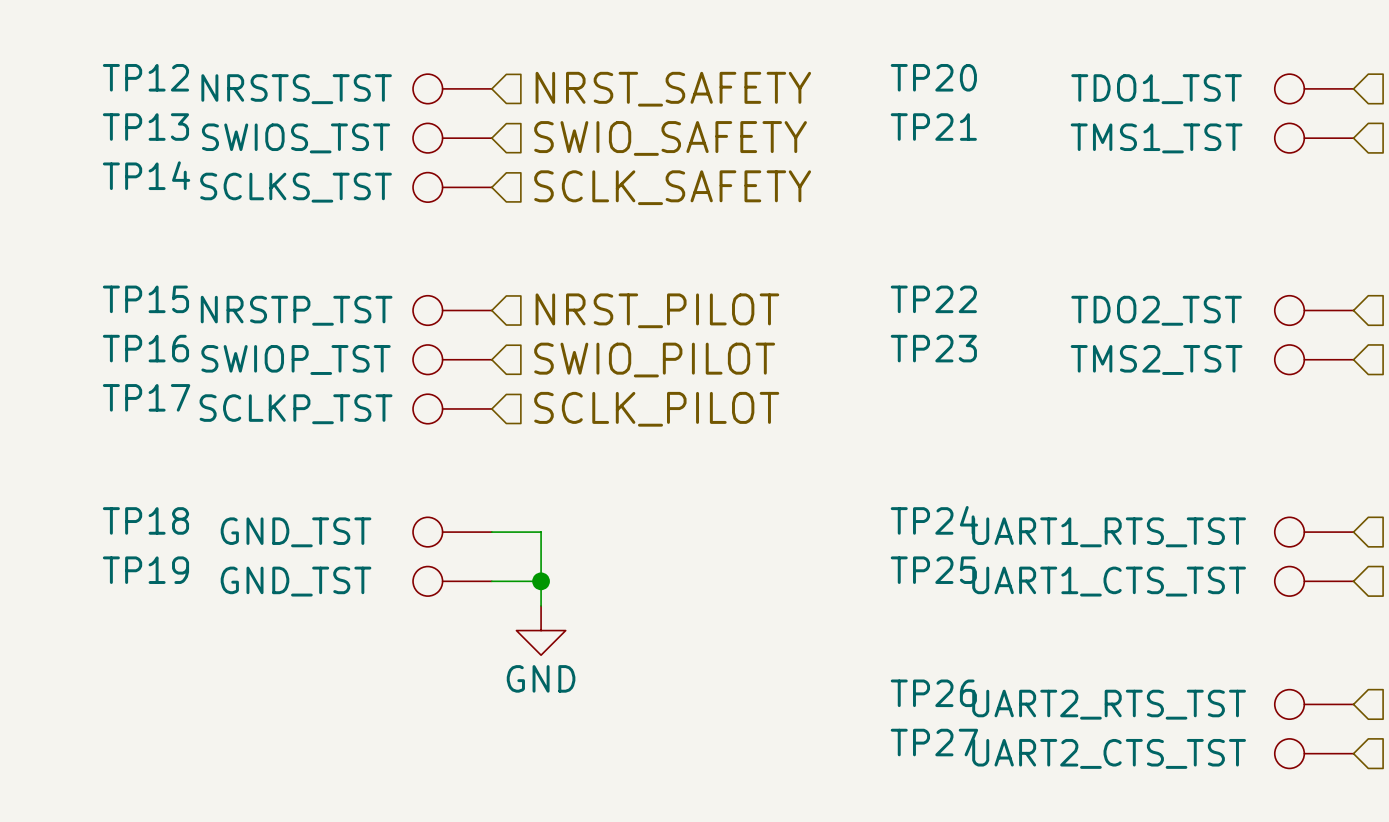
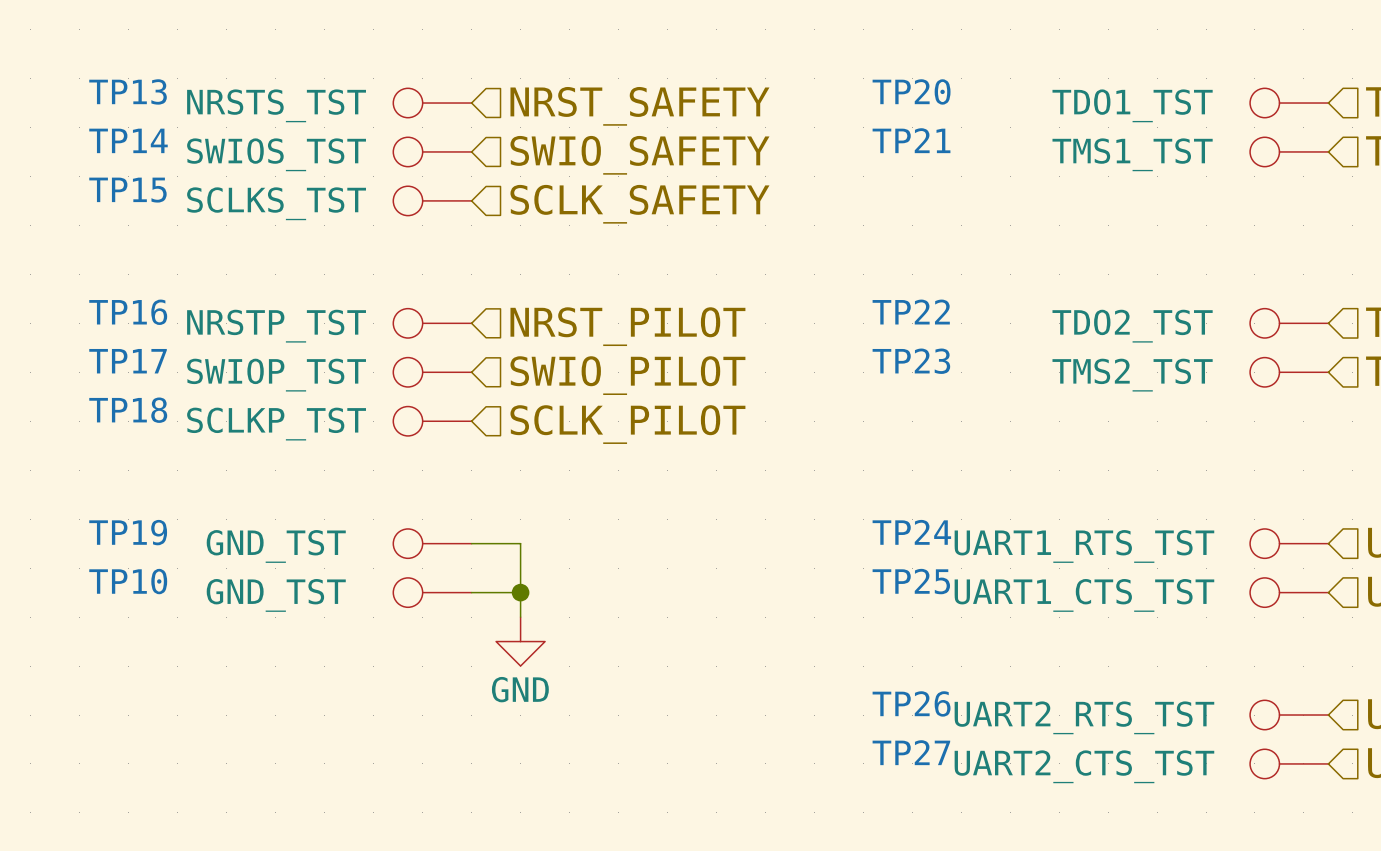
TP12 name: TP12 (145, 77) -> TP13 (128, 91)
TP13 name: TP13 (145, 127) -> TP14 (128, 140)
TP14 name: TP14 (146, 175) -> TP15 (127, 190)
TP15 name: TP15 (145, 299) -> TP16 (128, 312)
TP16 name: TP16 (145, 348) -> TP17 (128, 361)
TP17 name: TP17 (146, 397) -> TP18 (128, 410)
TP18 name: TP18 (145, 520) -> TP19 (128, 532)
TP19 name: TP19 (145, 570) -> TP10 (128, 581)

